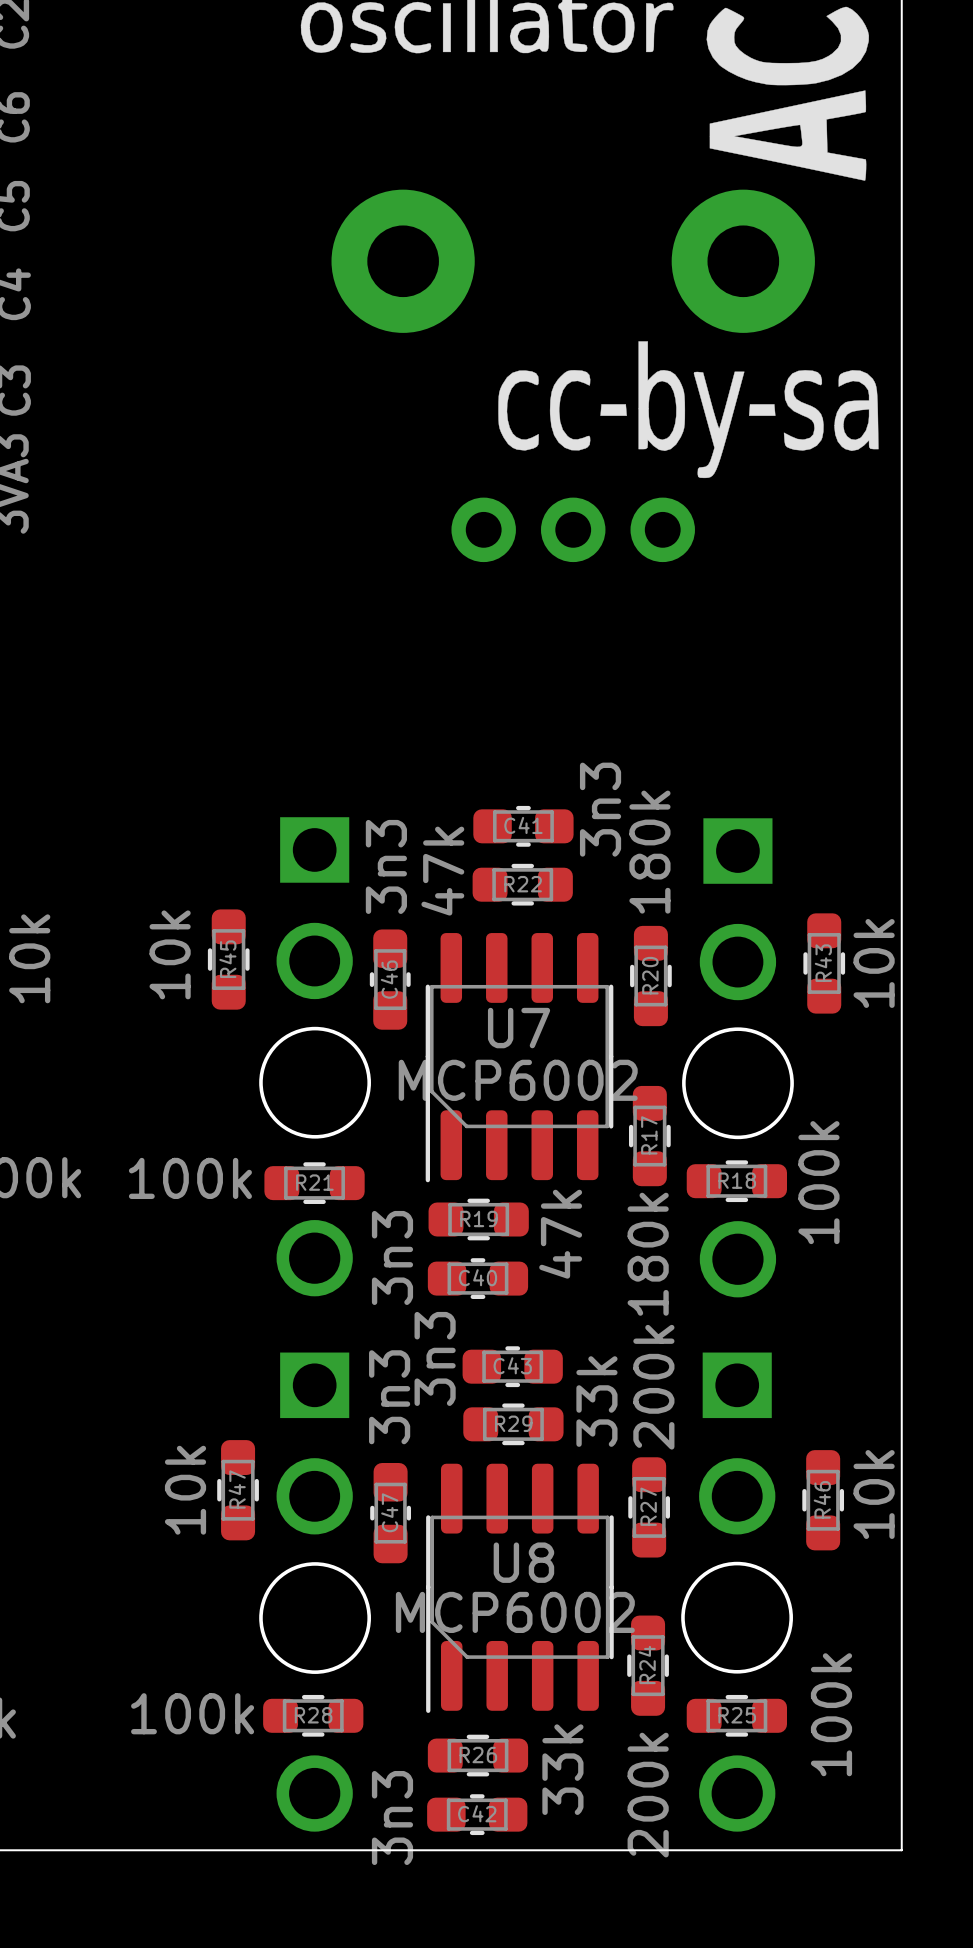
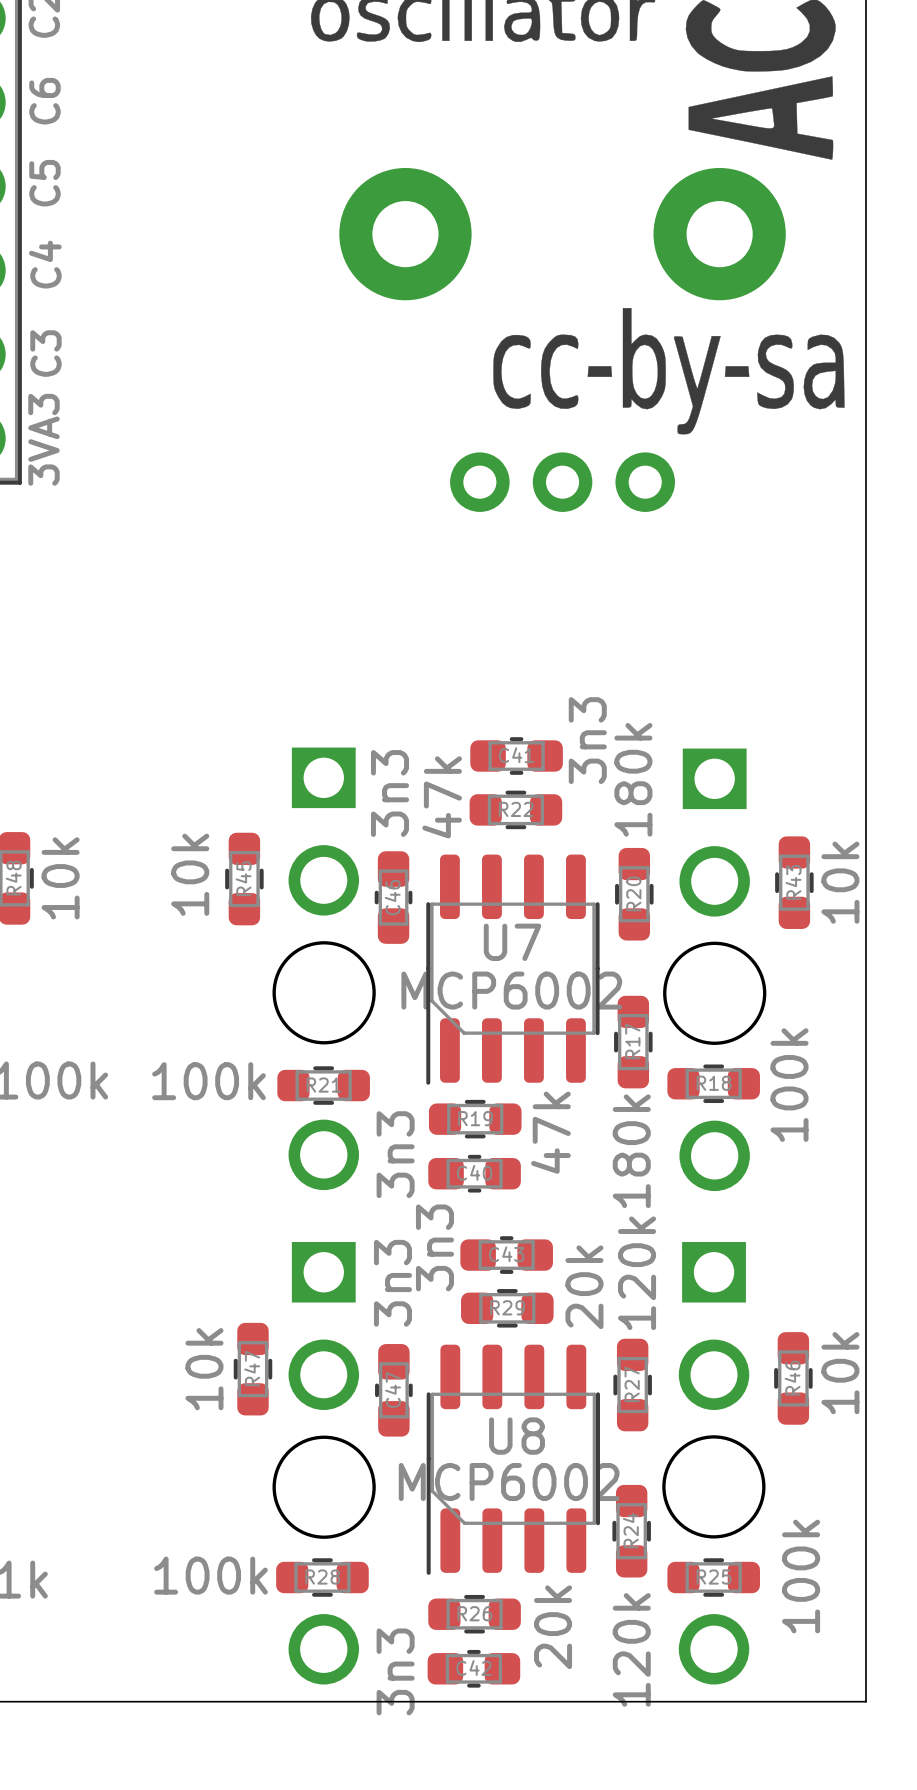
R27 value: 200k (653, 1387) -> 120k (637, 1273)
R29 value: 33k (596, 1401) -> 20k (584, 1287)
R26 value: 33k (562, 1769) -> 20k (553, 1627)
R24 value: 200k (648, 1795) -> 120k (631, 1649)

